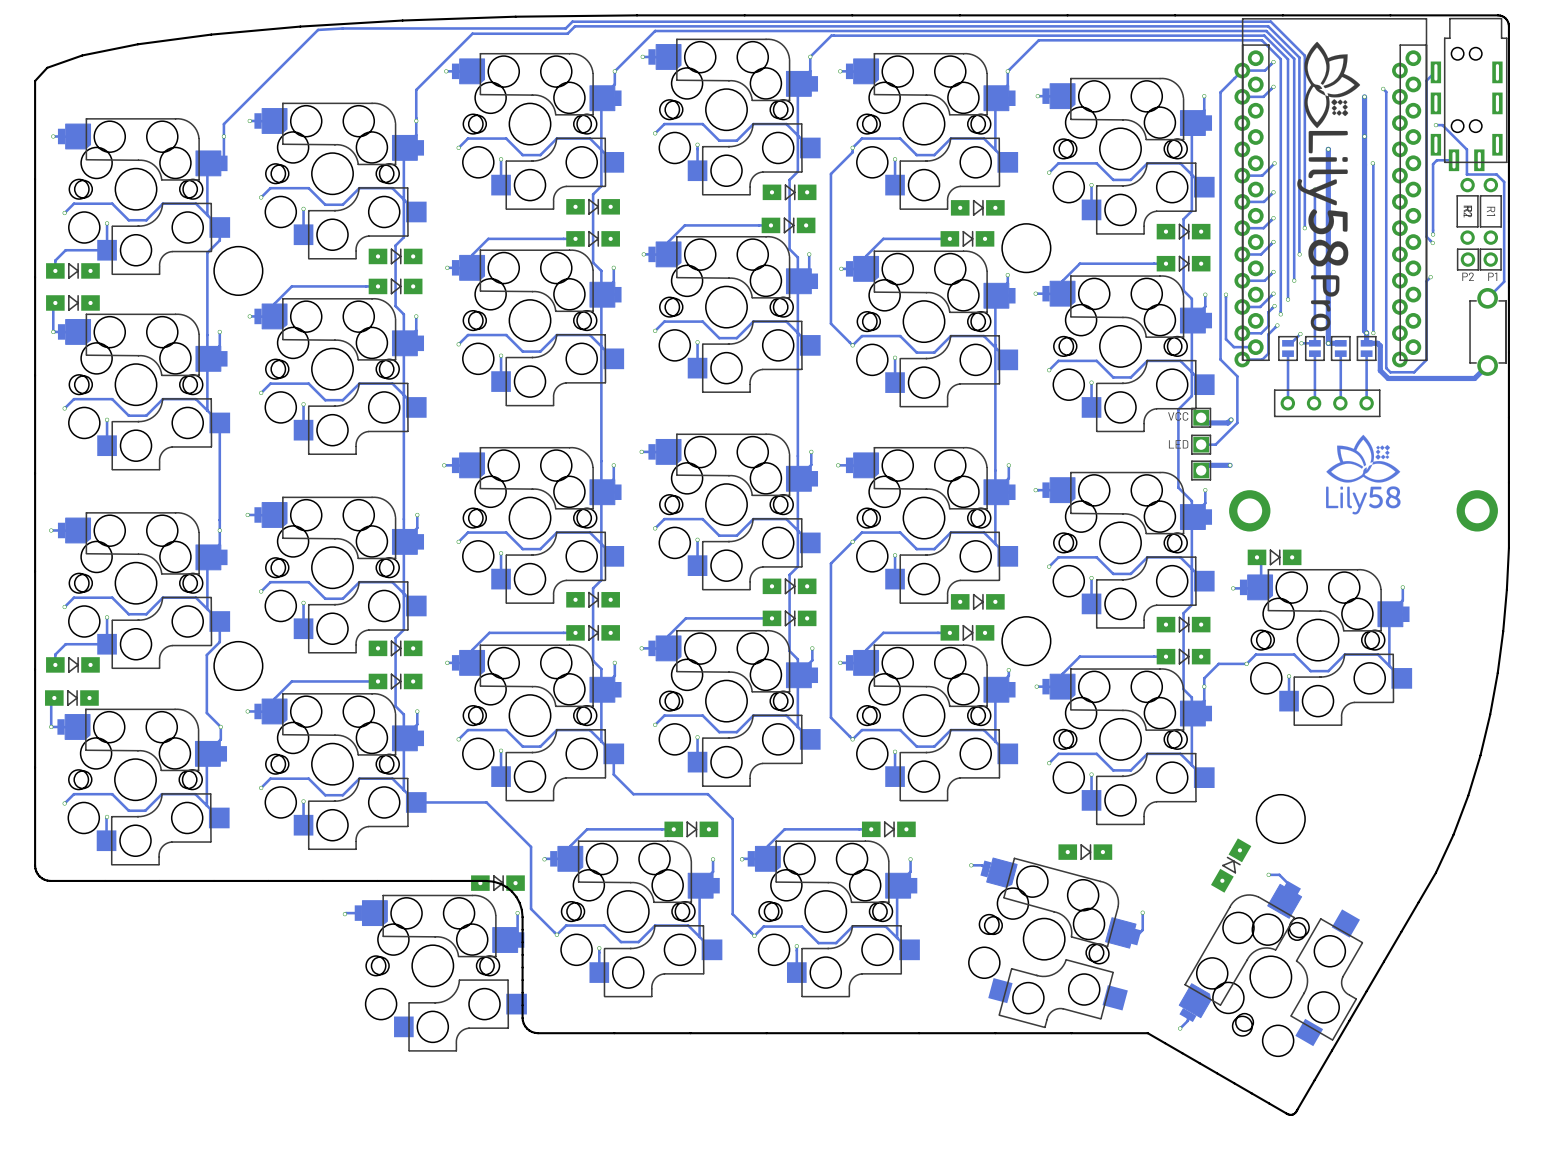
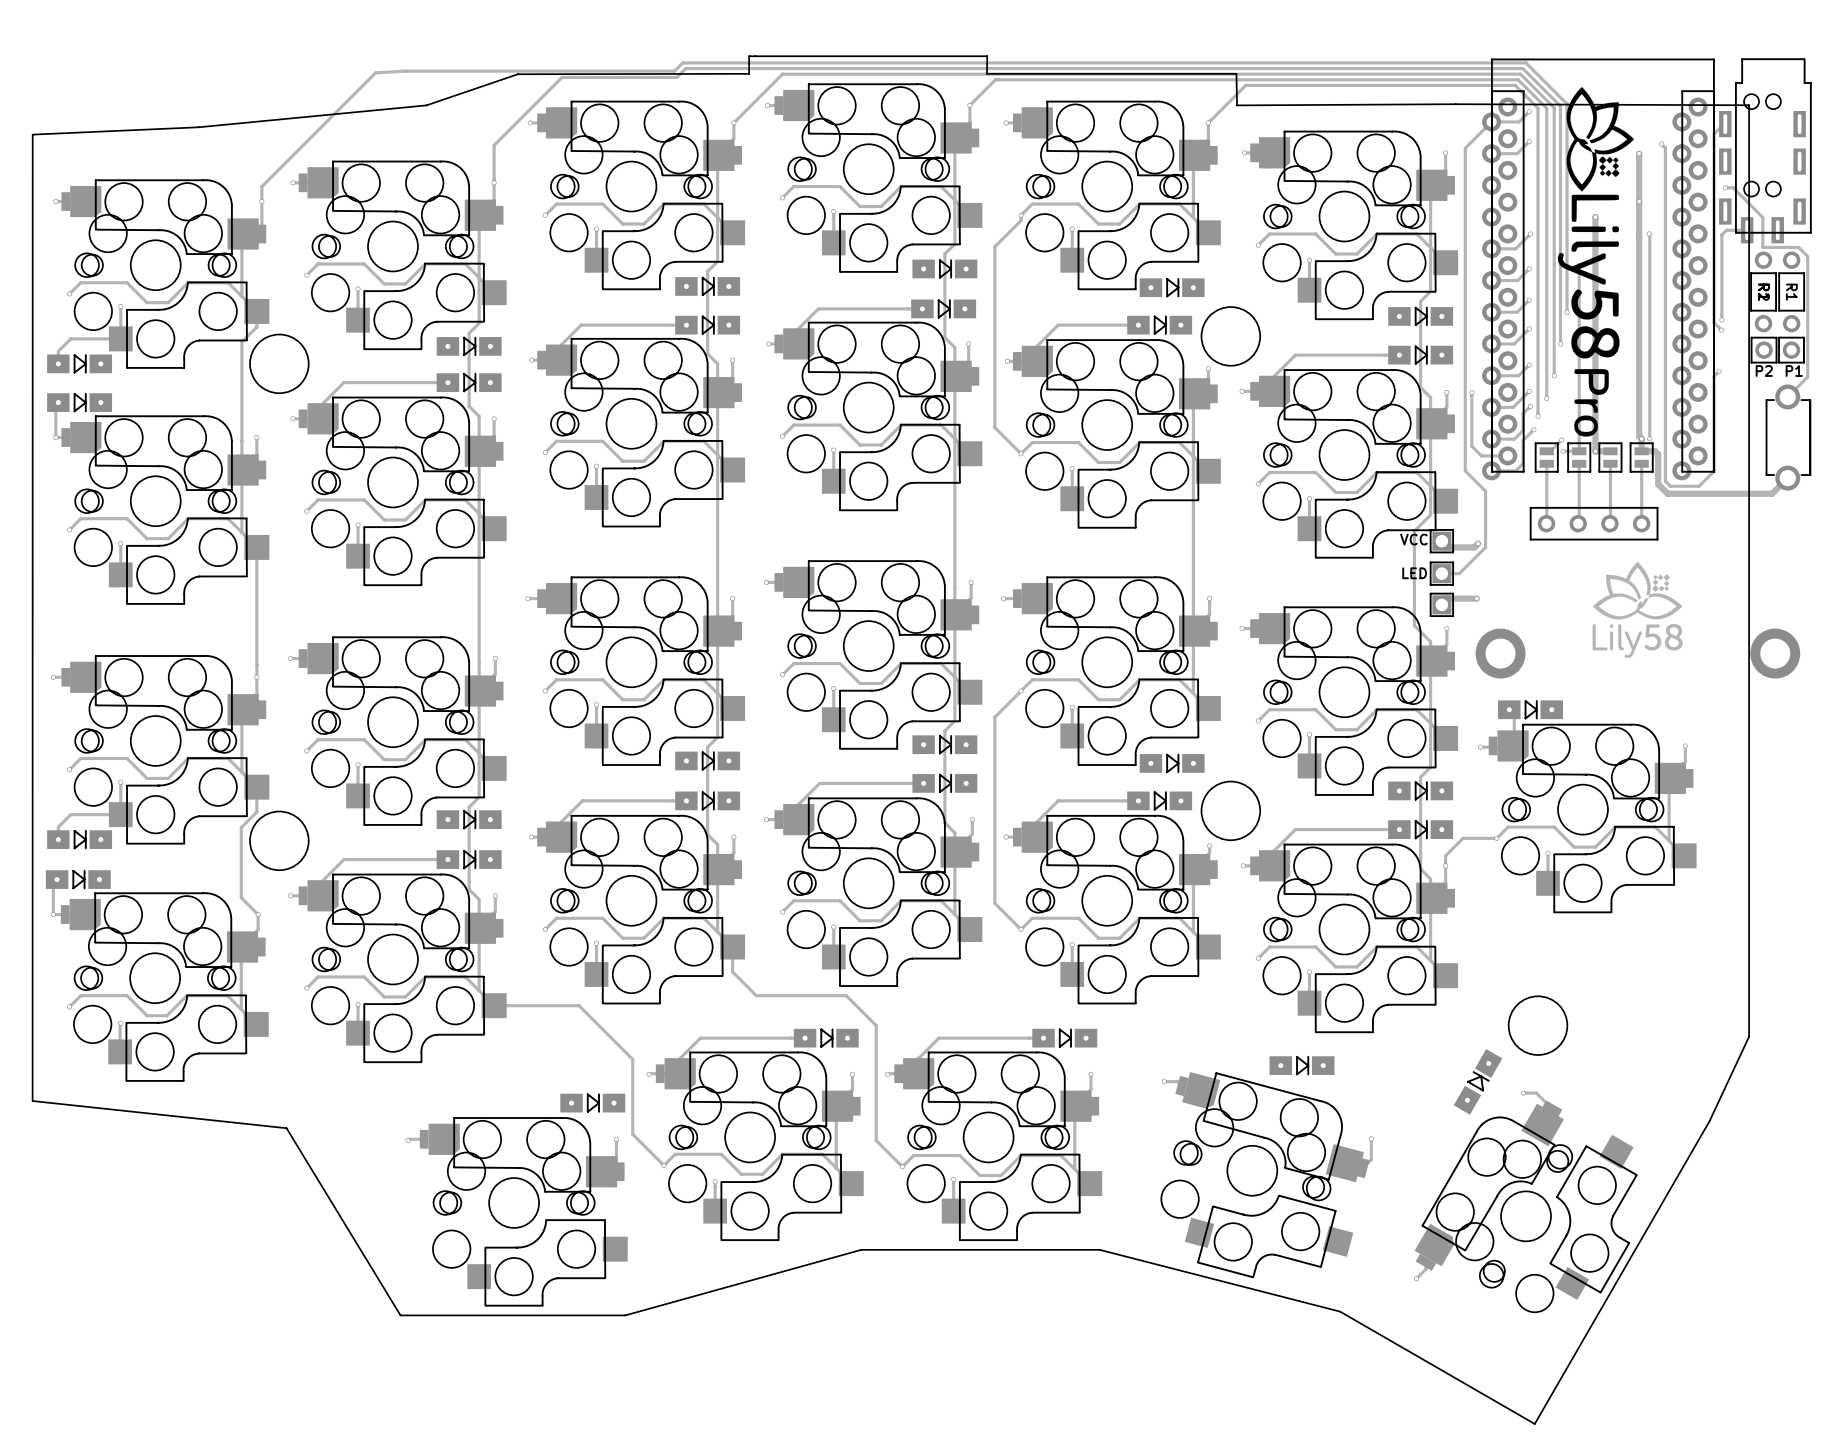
board edge: (1498, 15) (637, 15) (402, 20) (300, 26) (211, 34) (137, 44) (82, 55) (47, 67) (35, 81) (35, 865) (37, 874) (44, 879) (50, 880) (493, 881) (511, 891) (521, 909) (522, 1018) (527, 1028) (534, 1032) (1147, 1033) (1286, 1113) (1294, 1113) (1435, 872) (1453, 834) (1468, 795) (1490, 714) (1503, 631) (1508, 547) (1508, 26) (1505, 18) (1498, 15) -> (987, 56) (987, 73) (1236, 73) (1237, 105) (1749, 105) (1749, 1036) (1709, 1121) (1534, 1423) (1340, 1311) (1099, 1249) (861, 1249) (625, 1315) (400, 1315) (286, 1128) (32, 1101) (32, 134) (198, 127) (426, 105) (517, 74) (749, 73) (749, 56) (987, 56)

